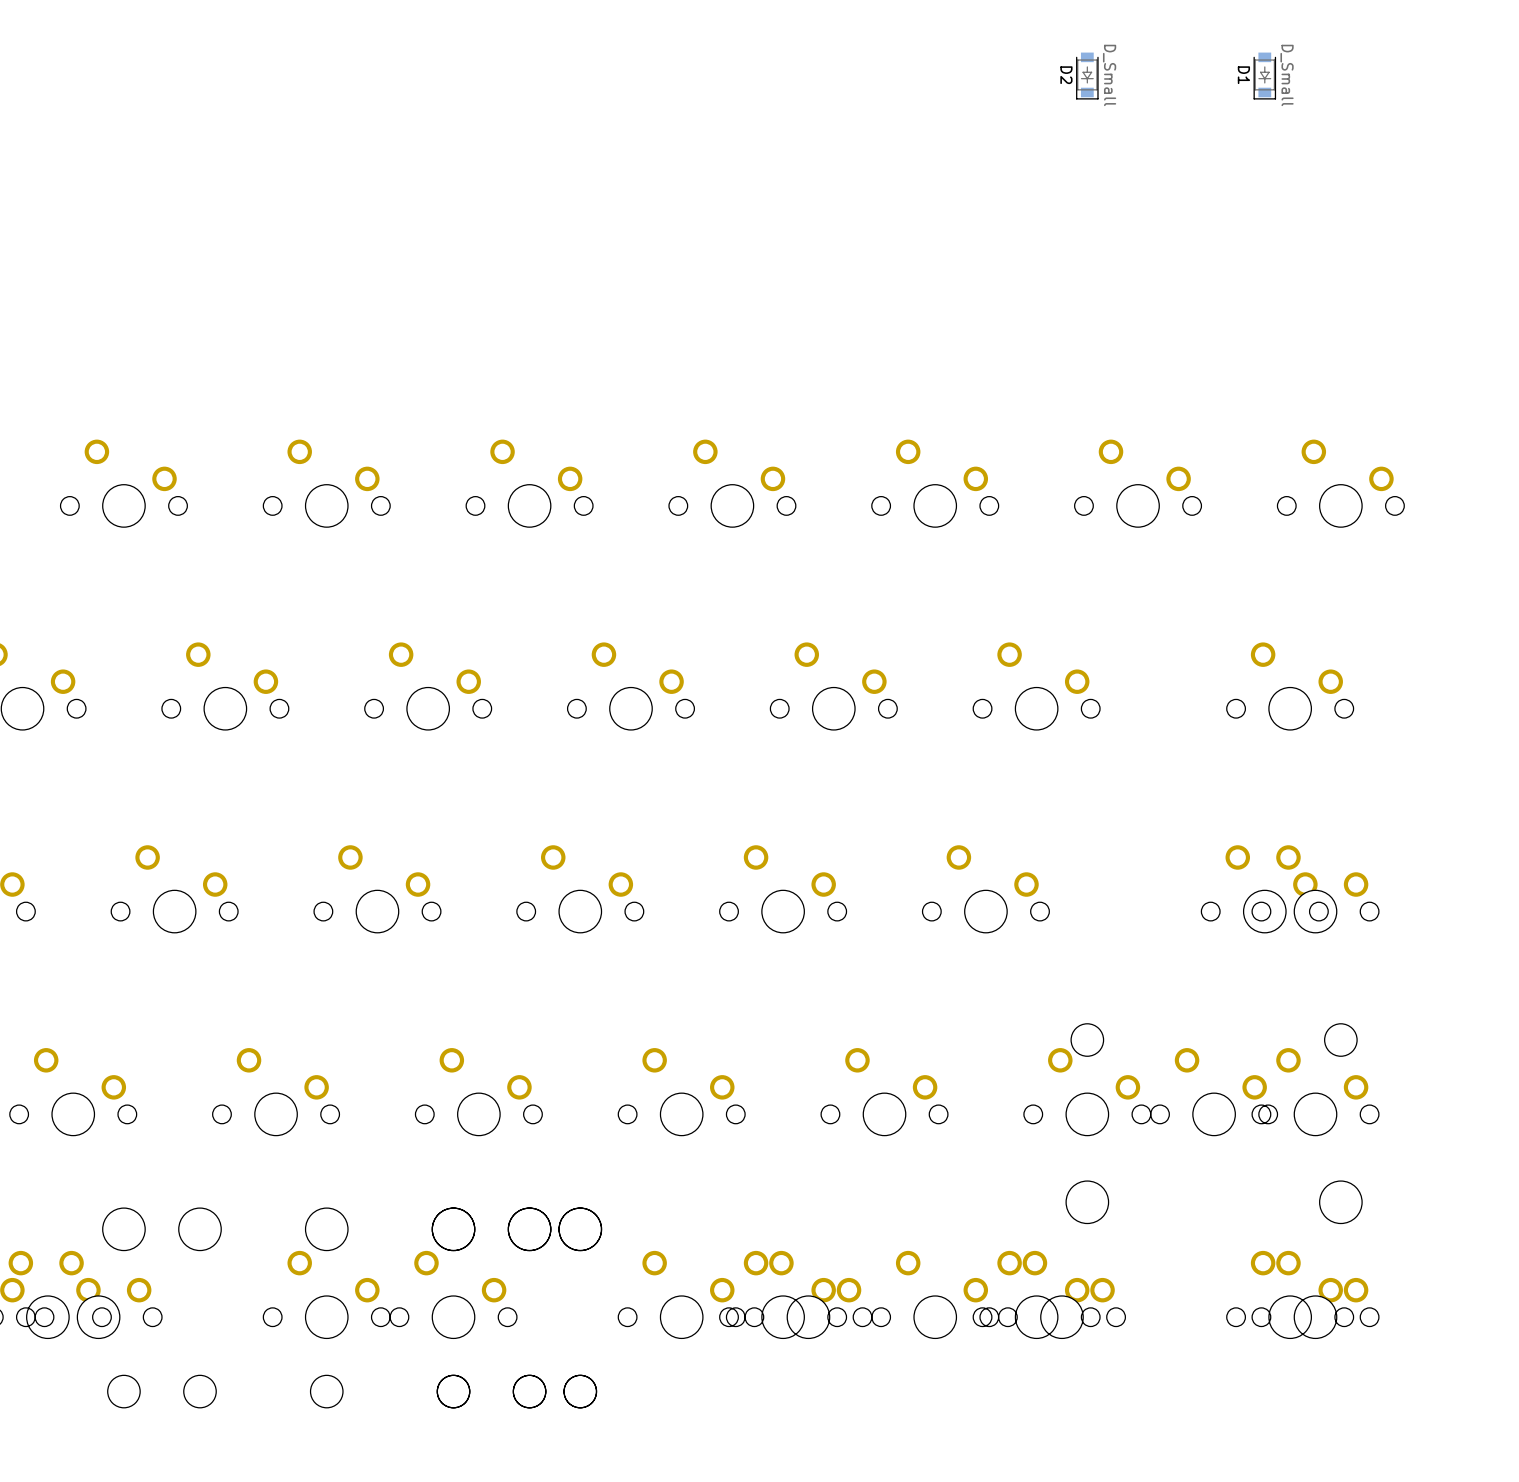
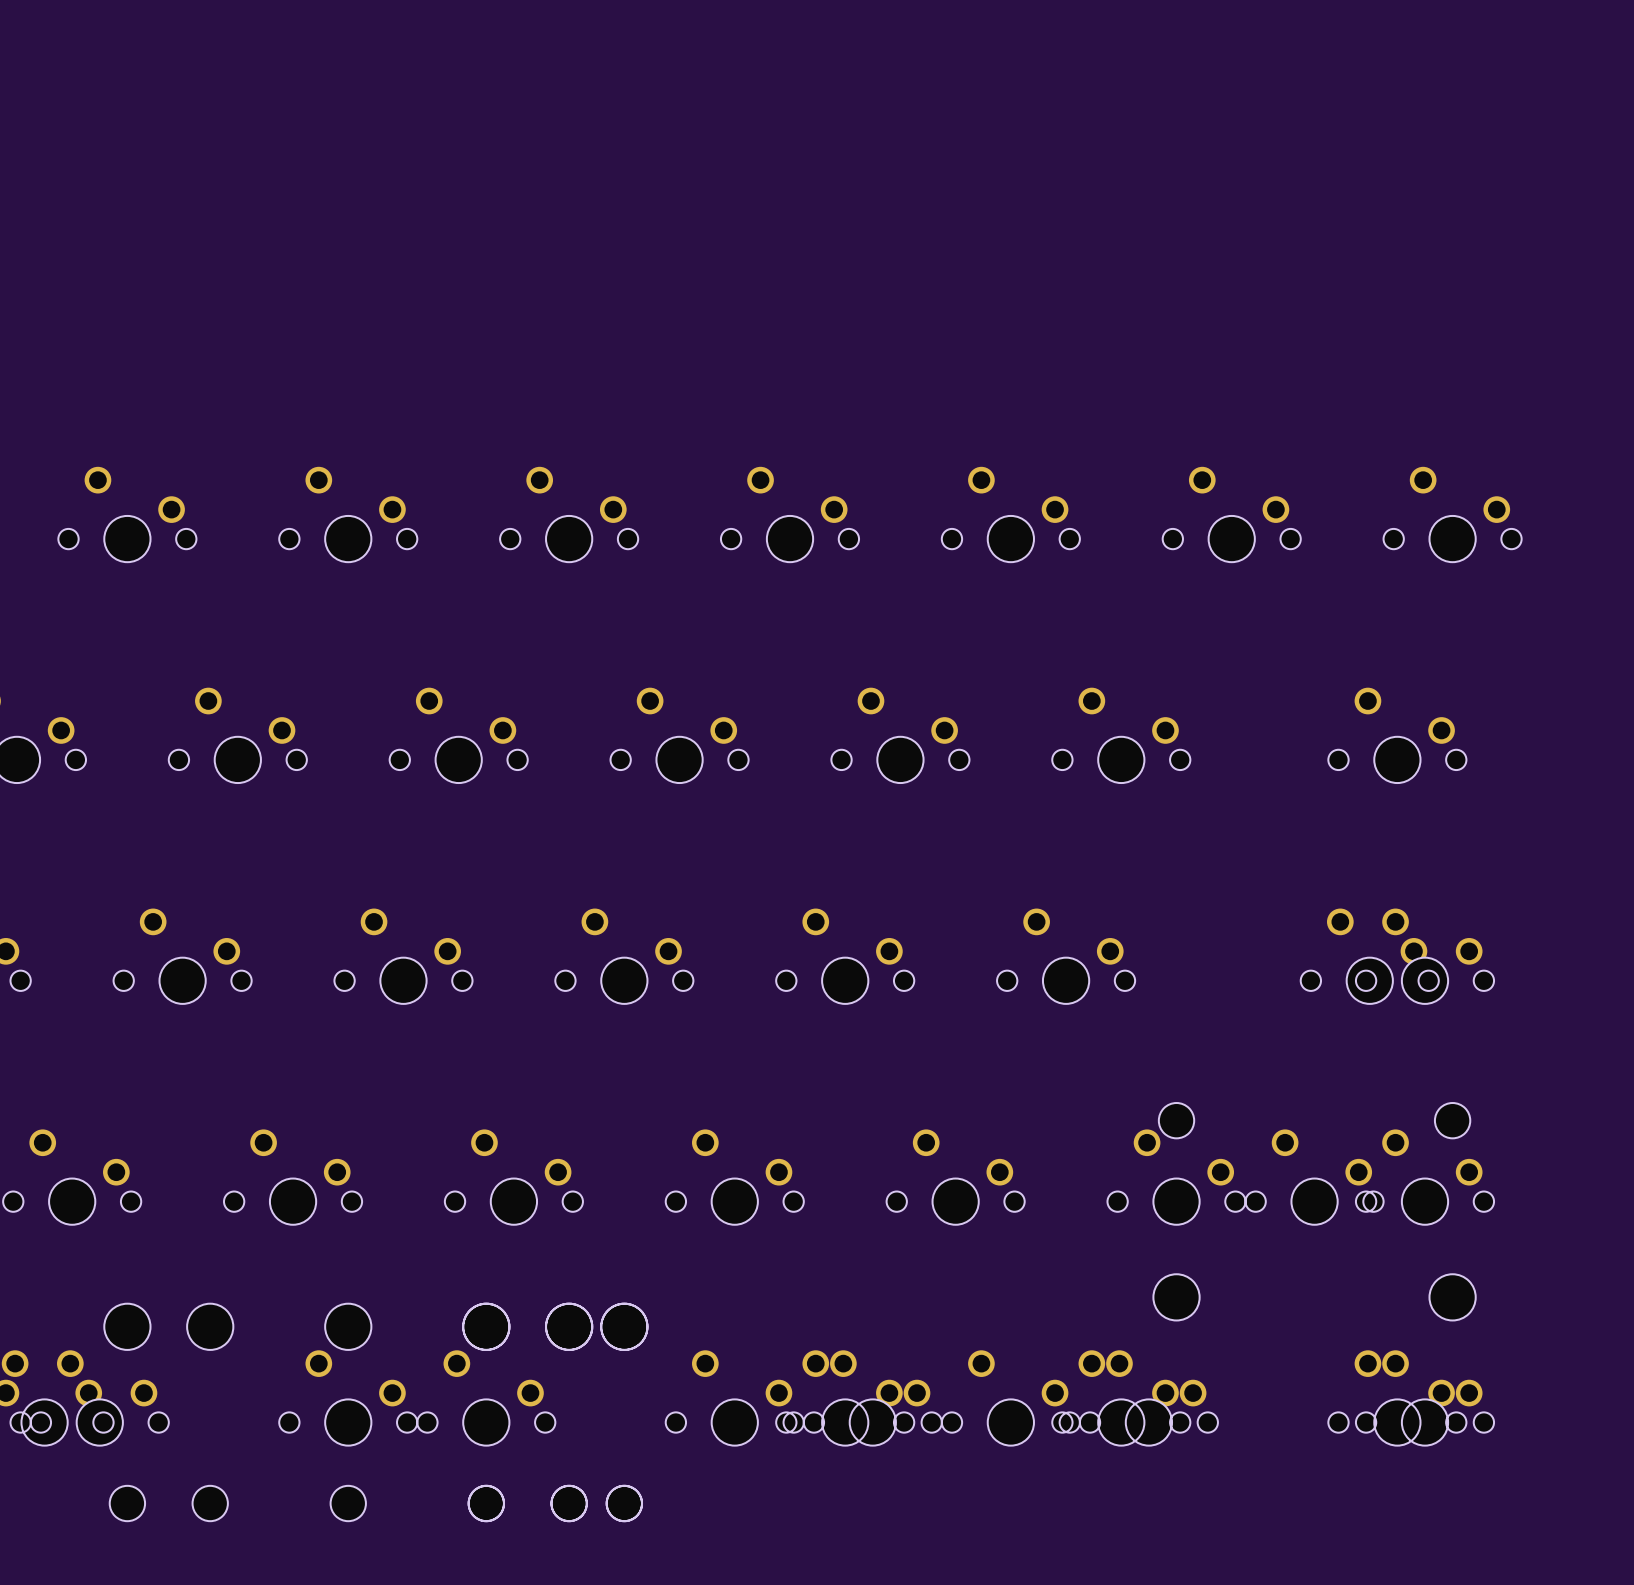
D2: D_Small (1087, 76) -> none
D1: D_Small (1264, 76) -> none

